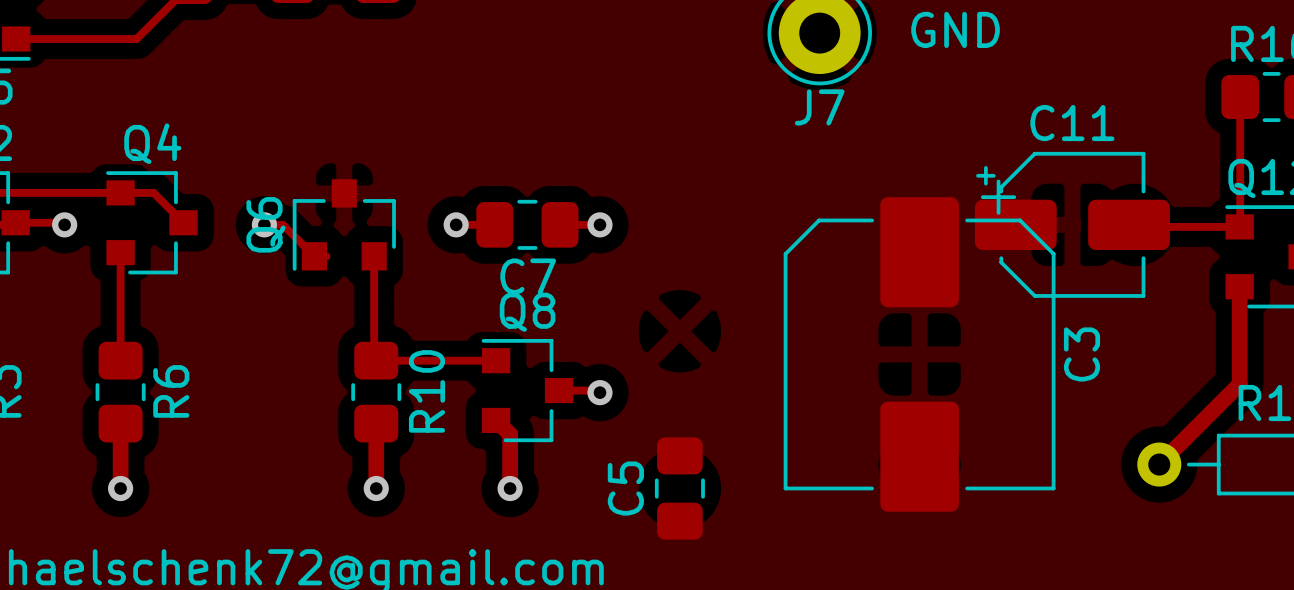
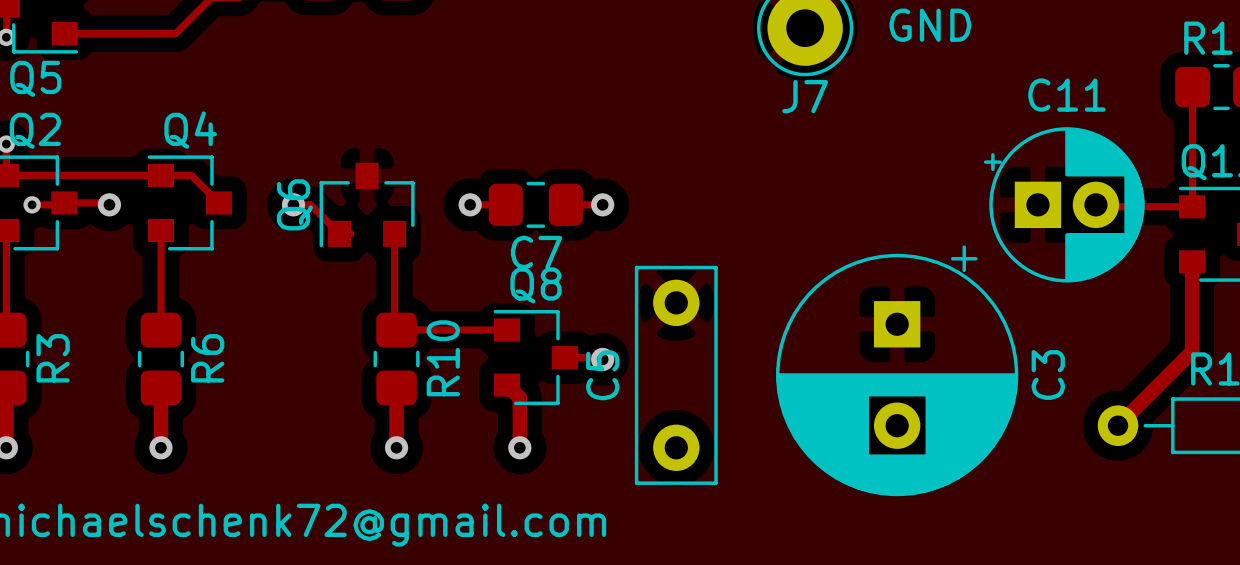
C11 footprint: [974, 151, 1170, 298] -> [983, 127, 1145, 283]
C3 footprint: [783, 179, 1056, 512] -> [776, 245, 1019, 497]
C5 footprint: [654, 437, 705, 540] -> [634, 265, 718, 485]

